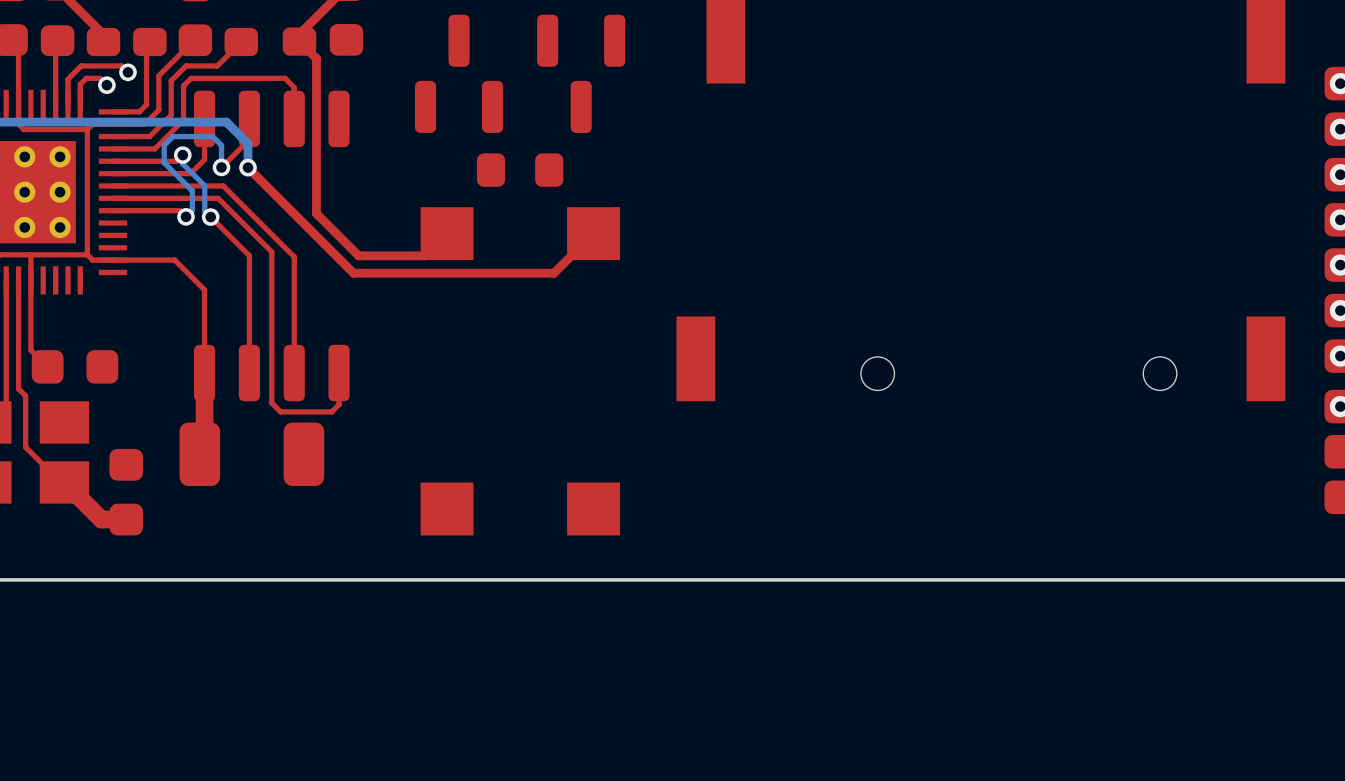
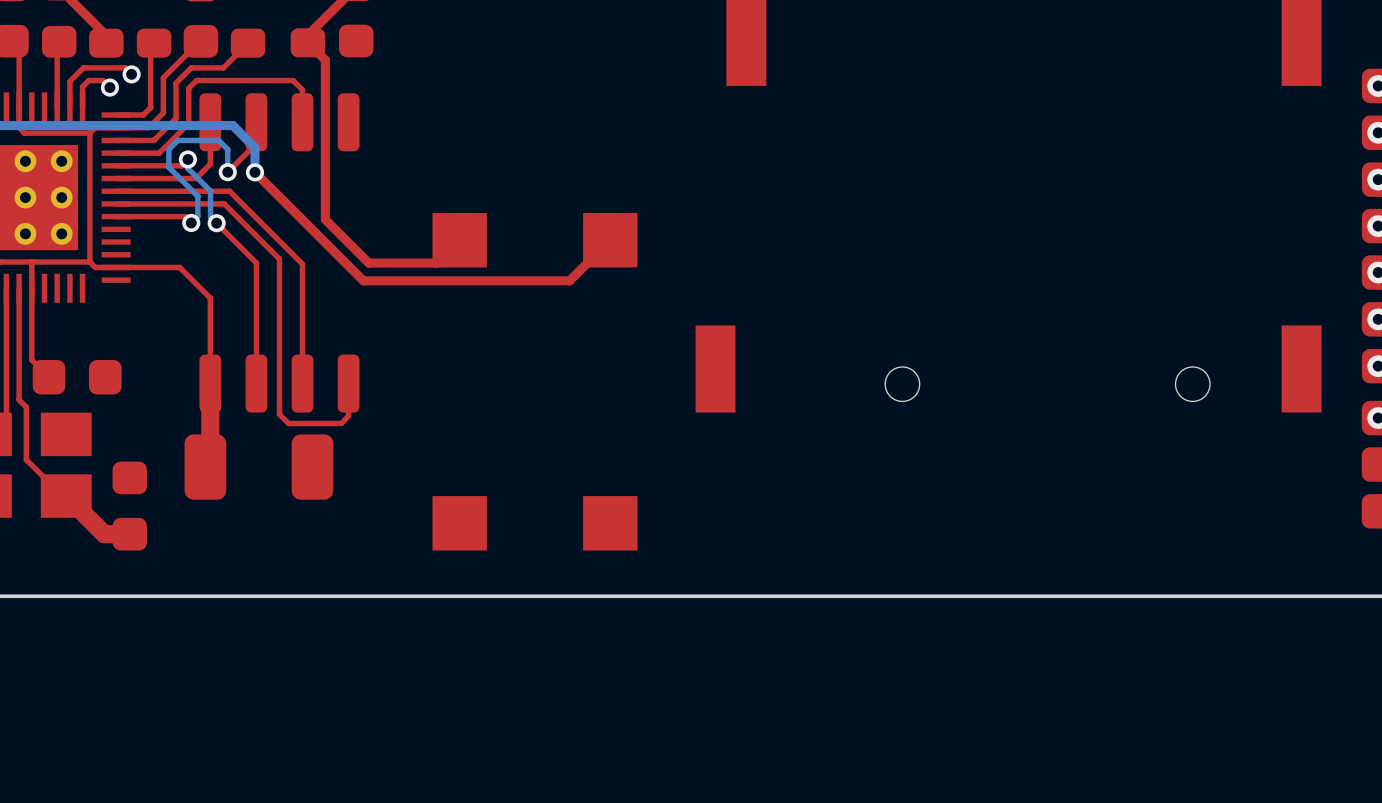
part: (459, 73) -> none
part: (581, 73) -> none
part: (520, 170) -> none

